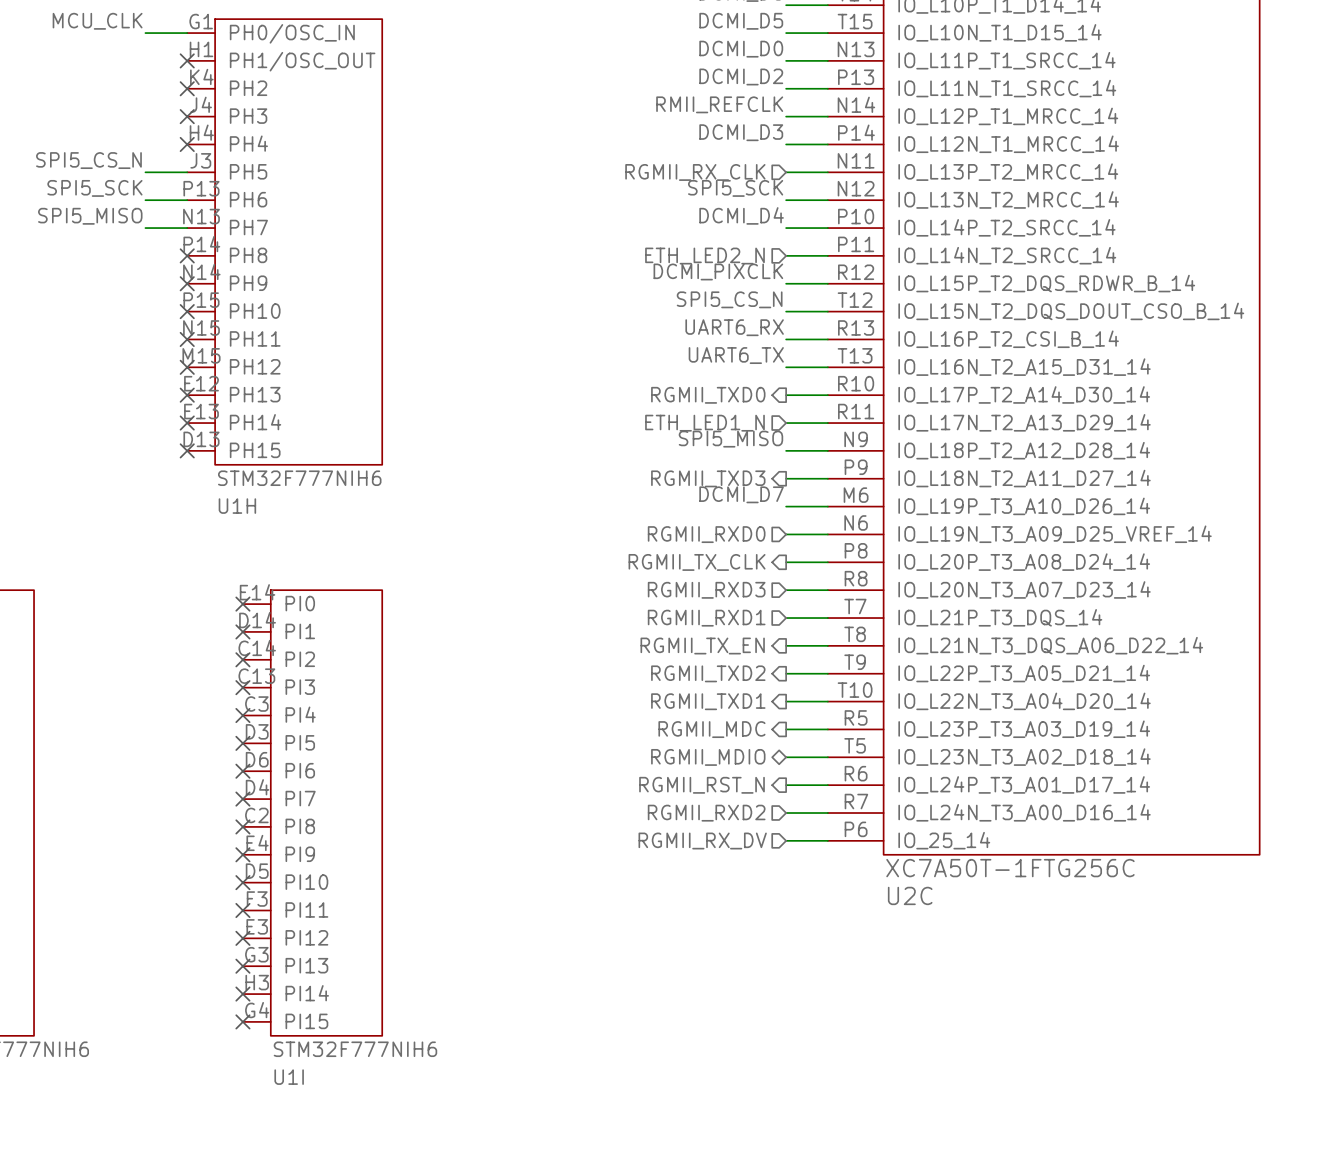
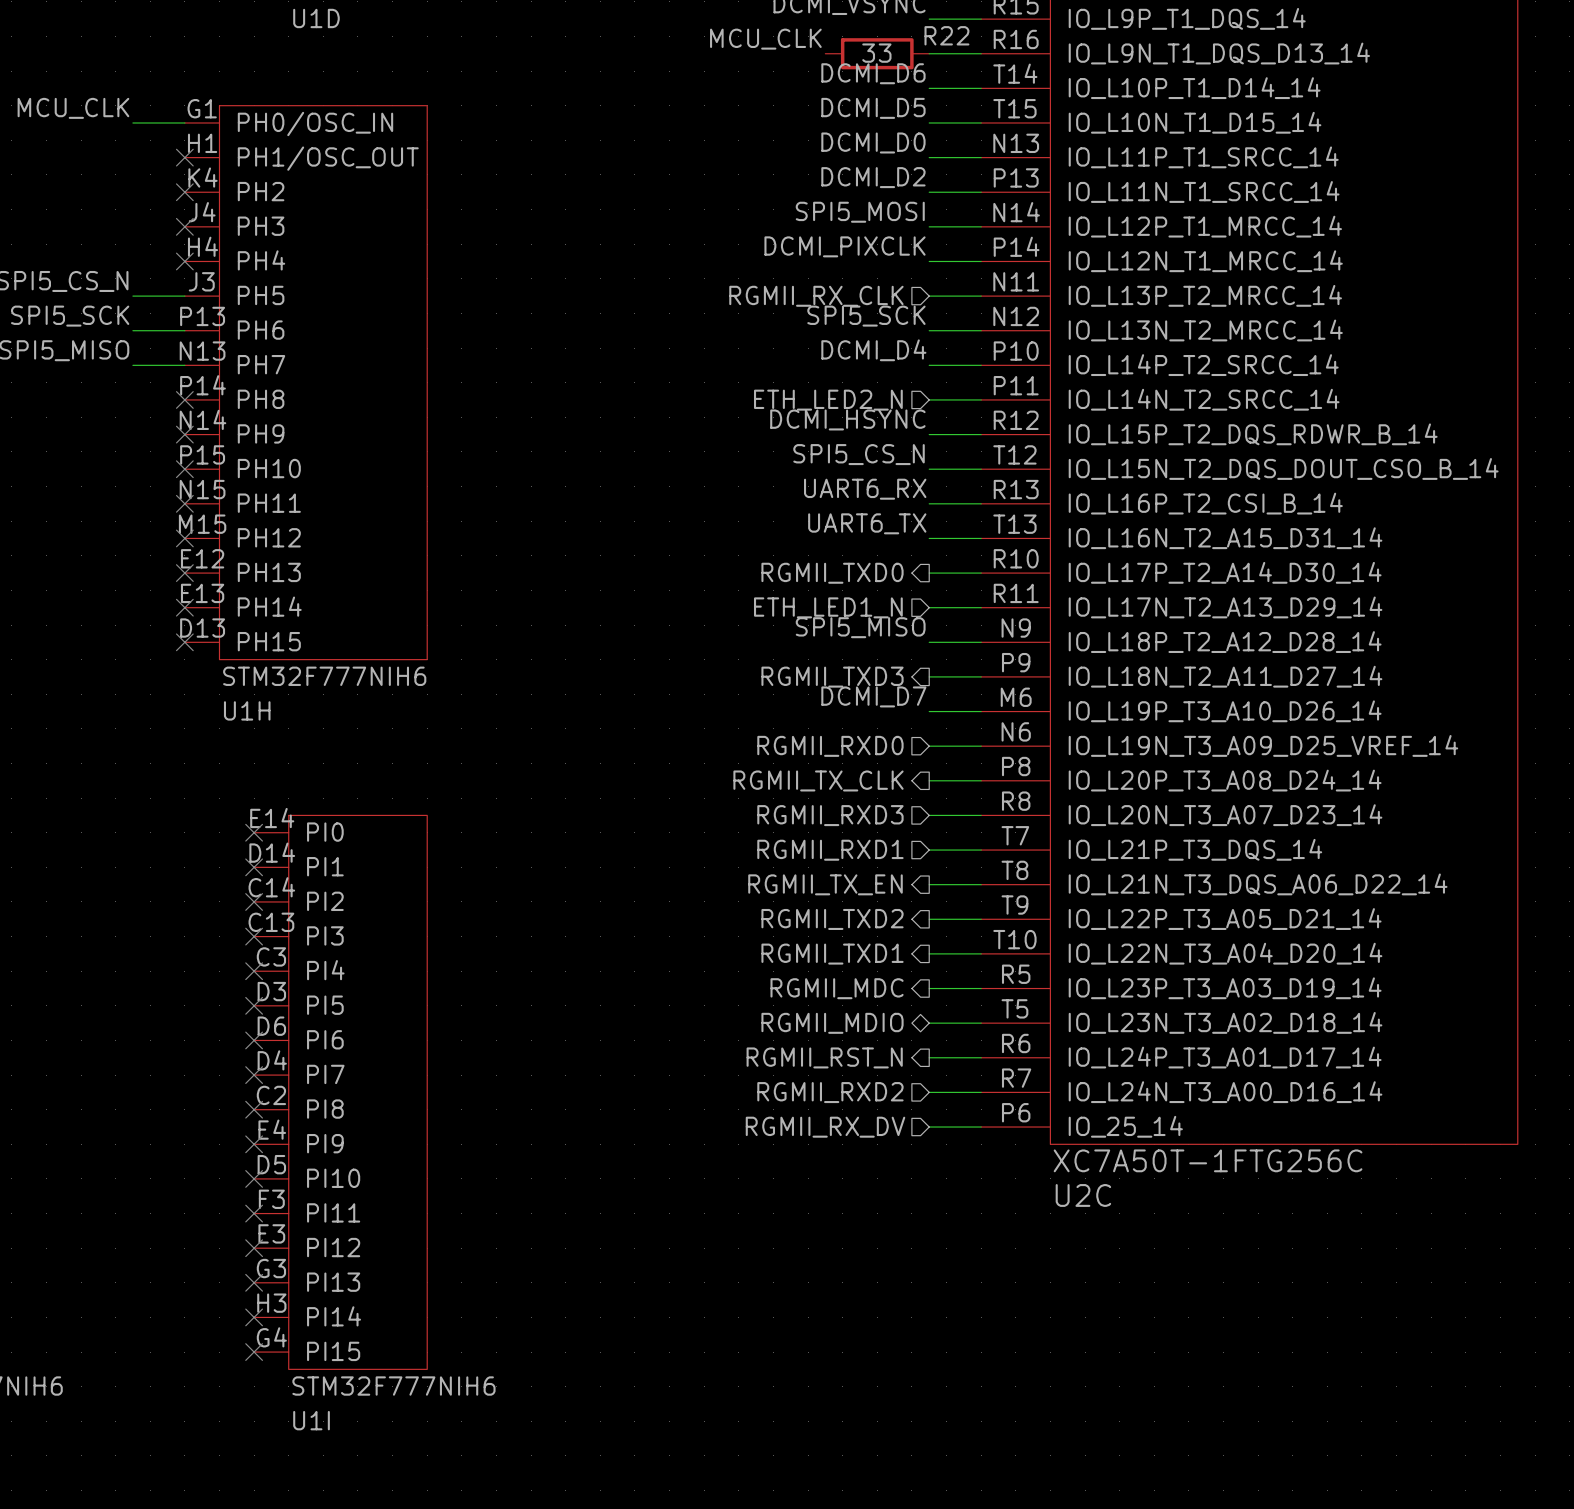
label: RMII_REFCLK (719, 104) -> SPI5_MOSI (860, 212)
label: DCMI_D3 (741, 132) -> DCMI_PIXCLK (845, 246)
label: DCMI_PIXCLK (718, 271) -> DCMI_HSYNC (847, 419)

